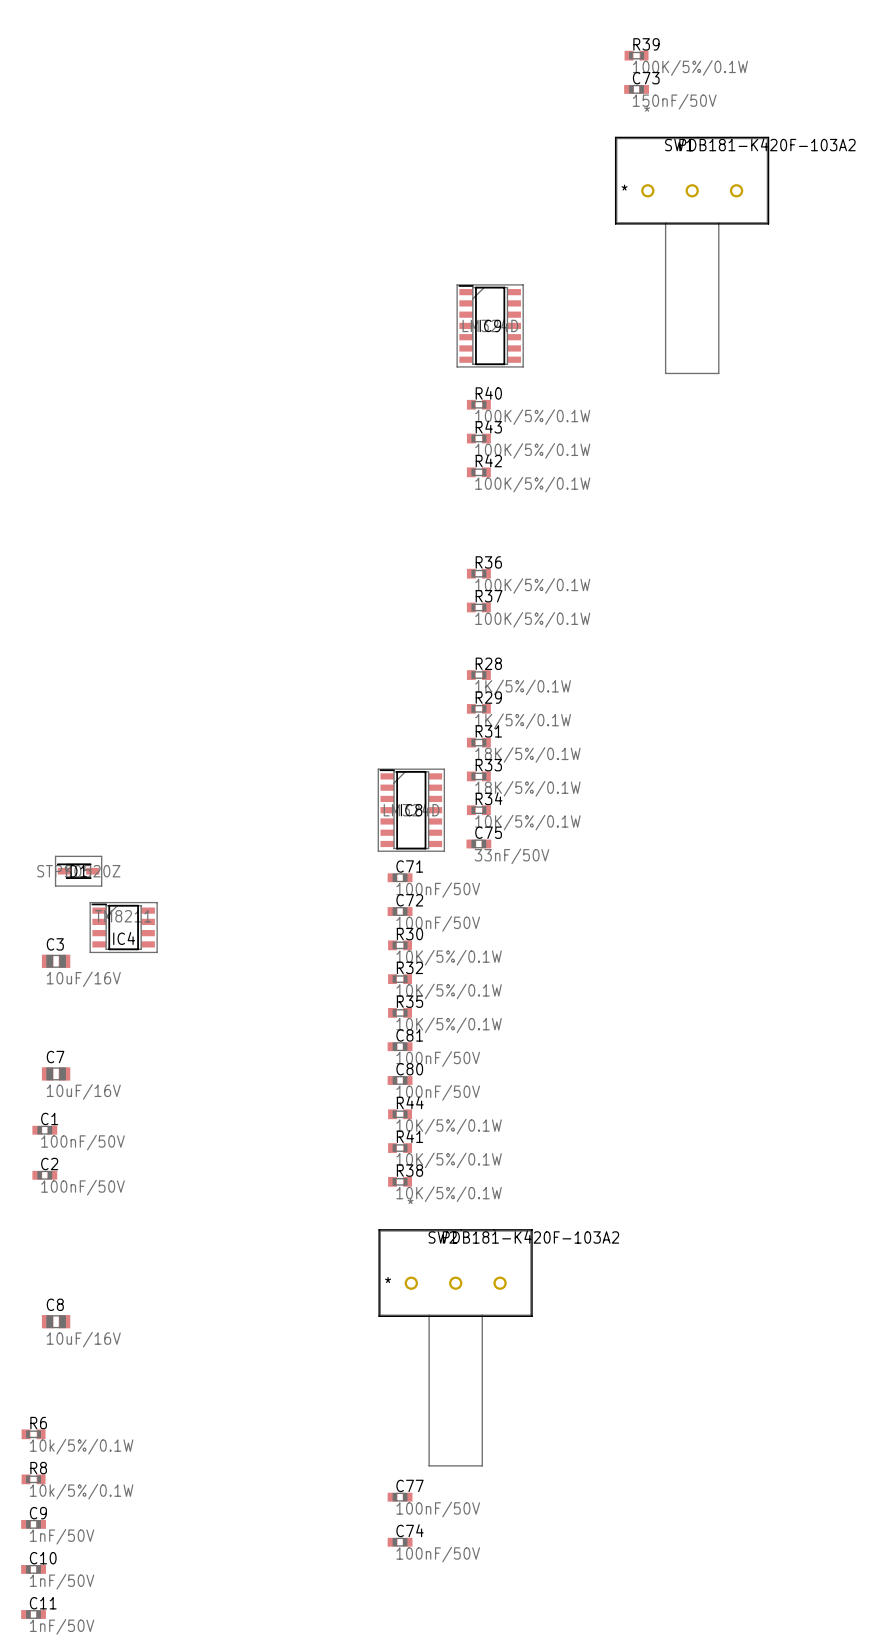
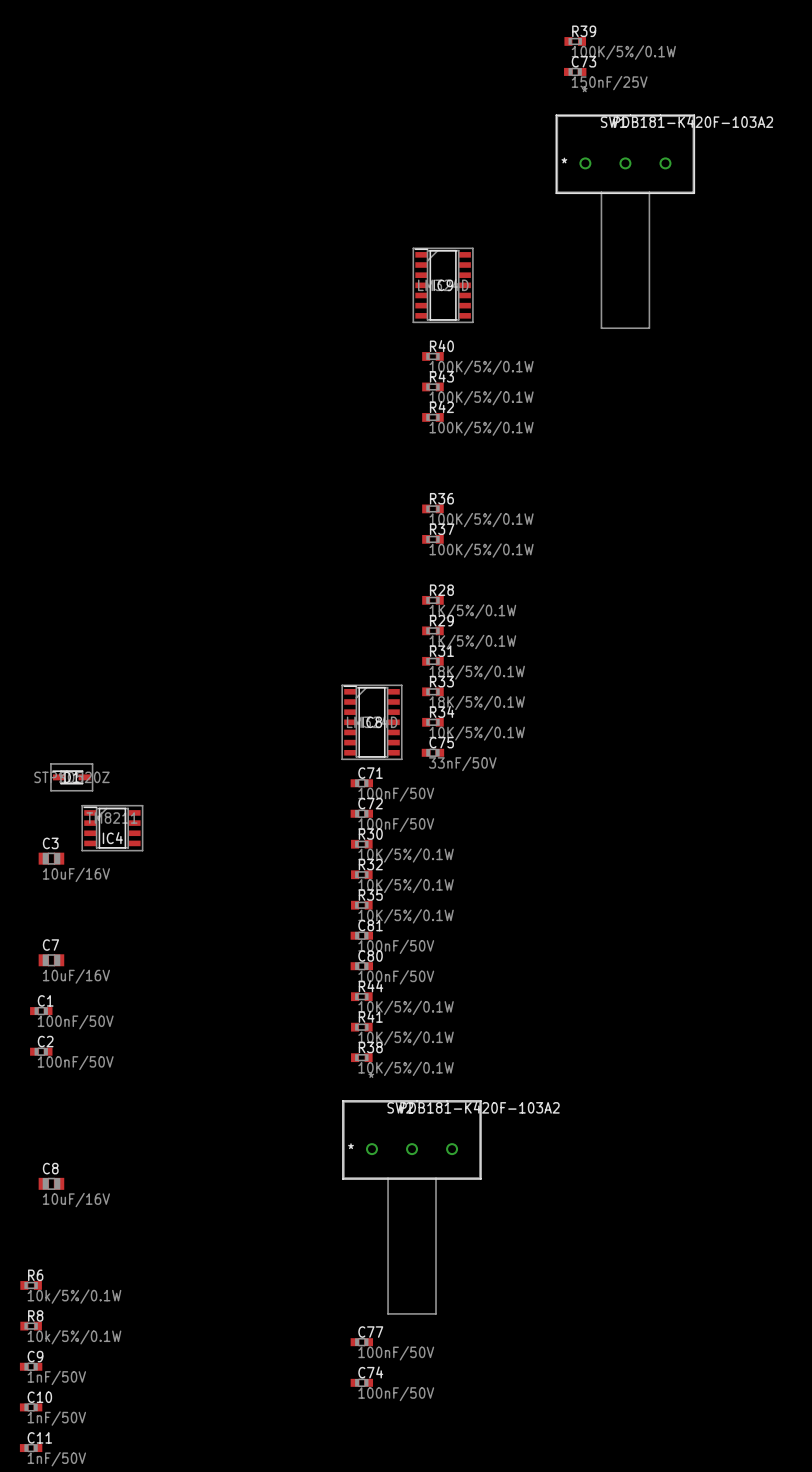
C73 value: 150nF/50V (674, 101) -> 150nF/25V (609, 83)

